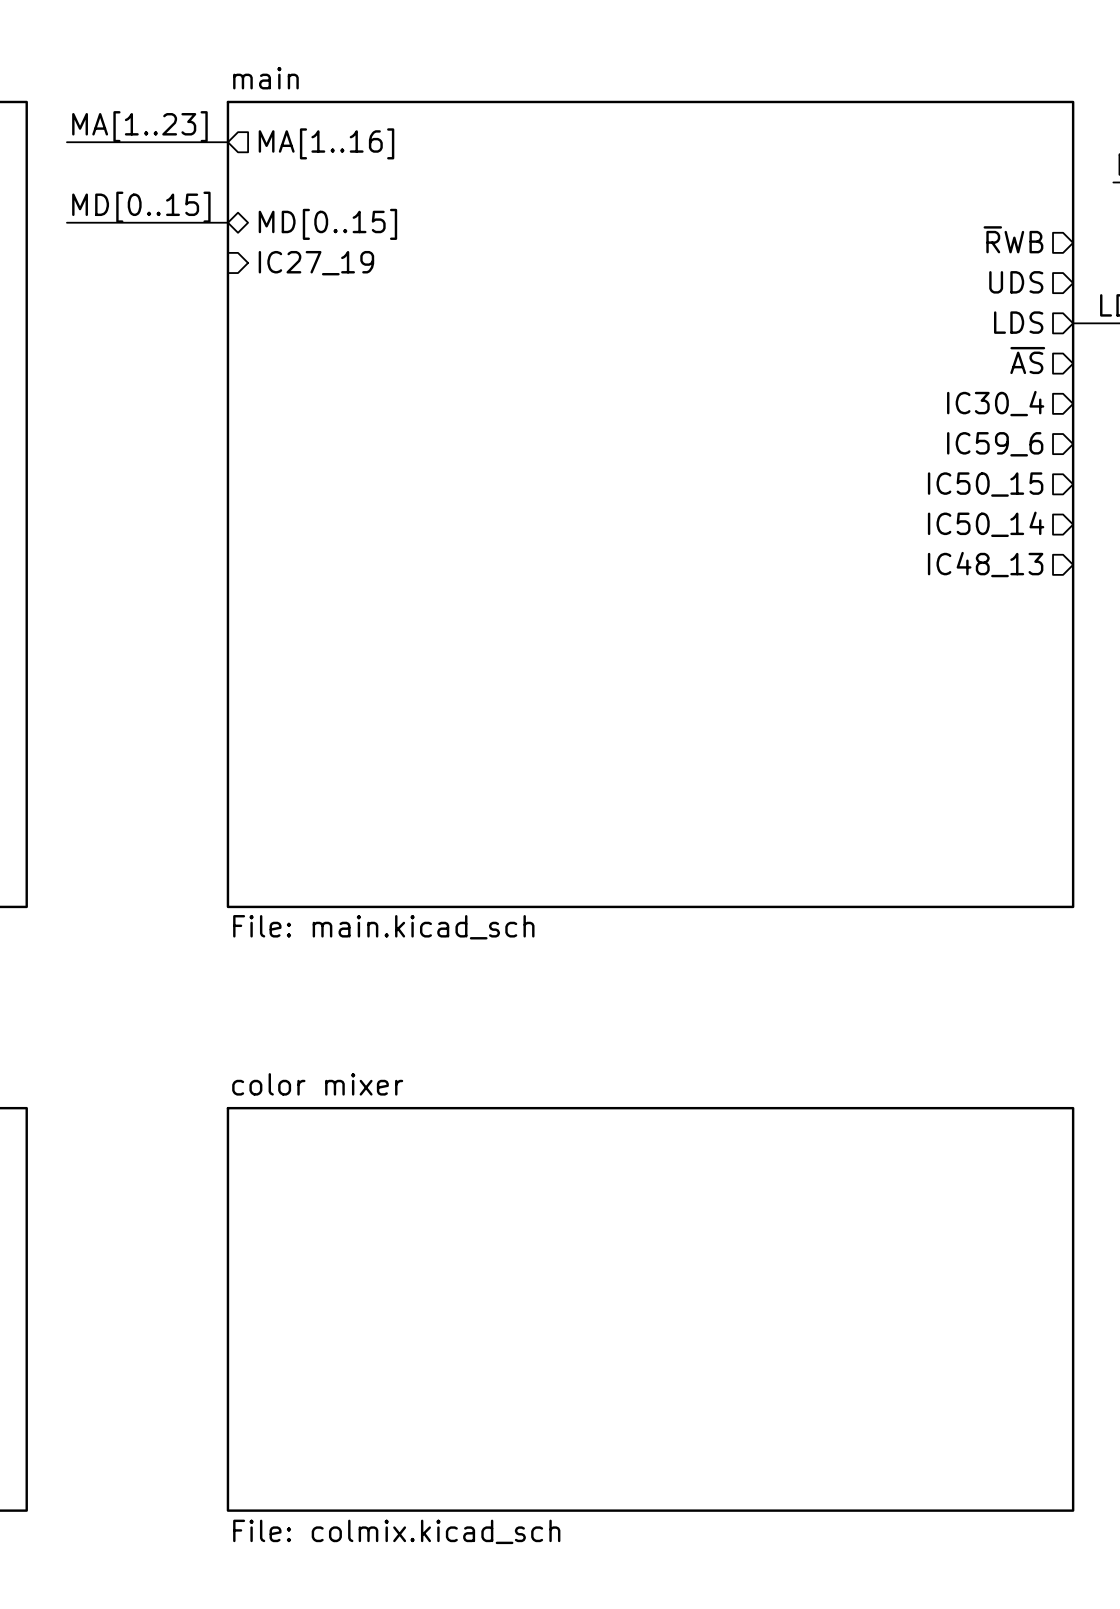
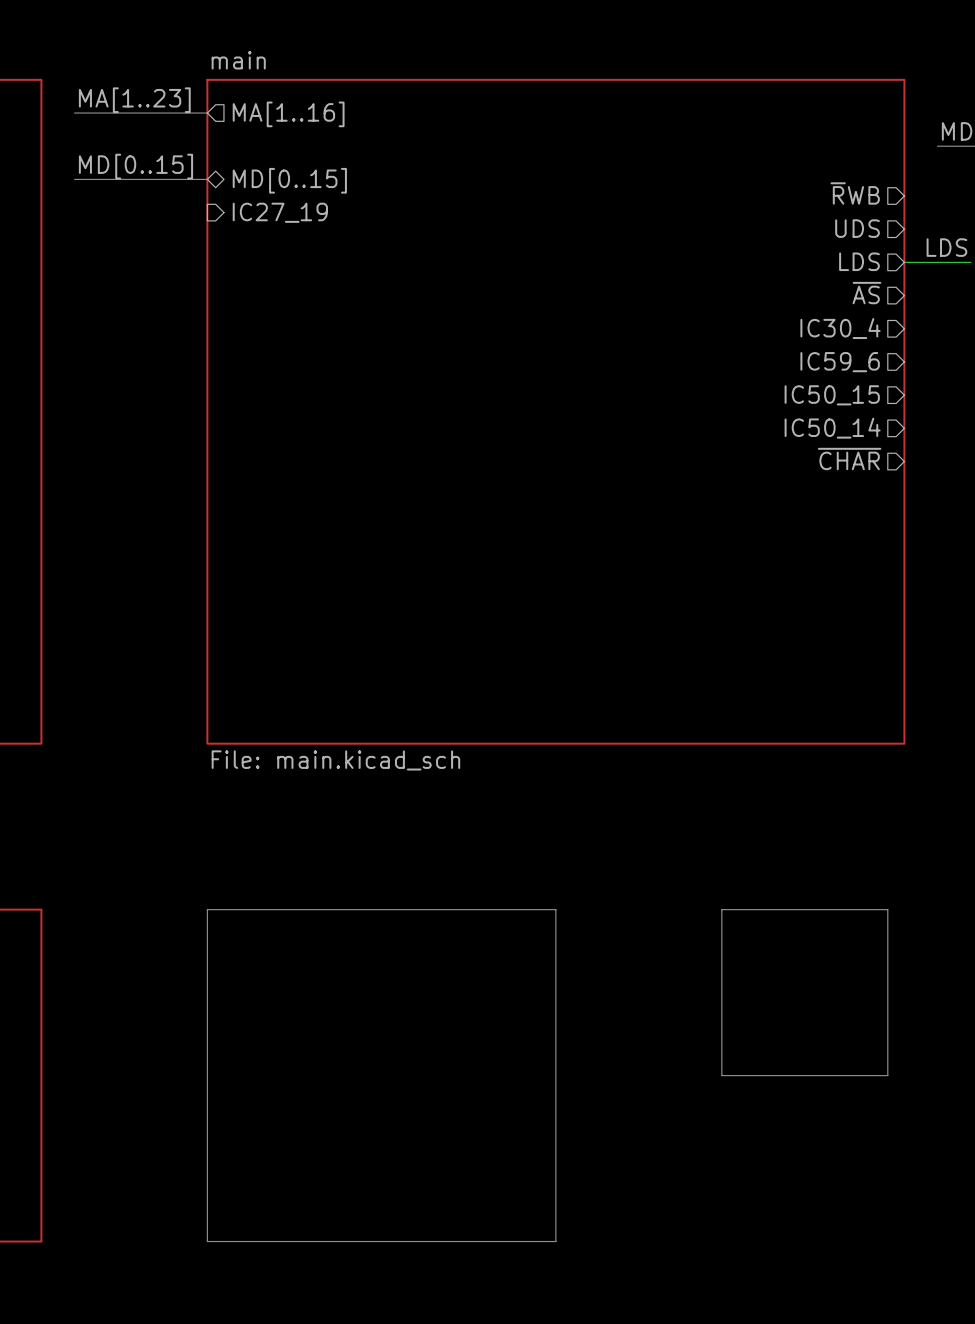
sheet pin: IC48_13 (985, 564) -> ~{CHAR} (849, 459)
line: none -> (207, 909) (555, 909) (555, 1241) (207, 1241) (207, 909)
line: none -> (721, 909) (887, 909) (887, 1075) (721, 1075) (721, 909)
sheet color mixer: File: colmix.kicad_sch (650, 1309) -> none

